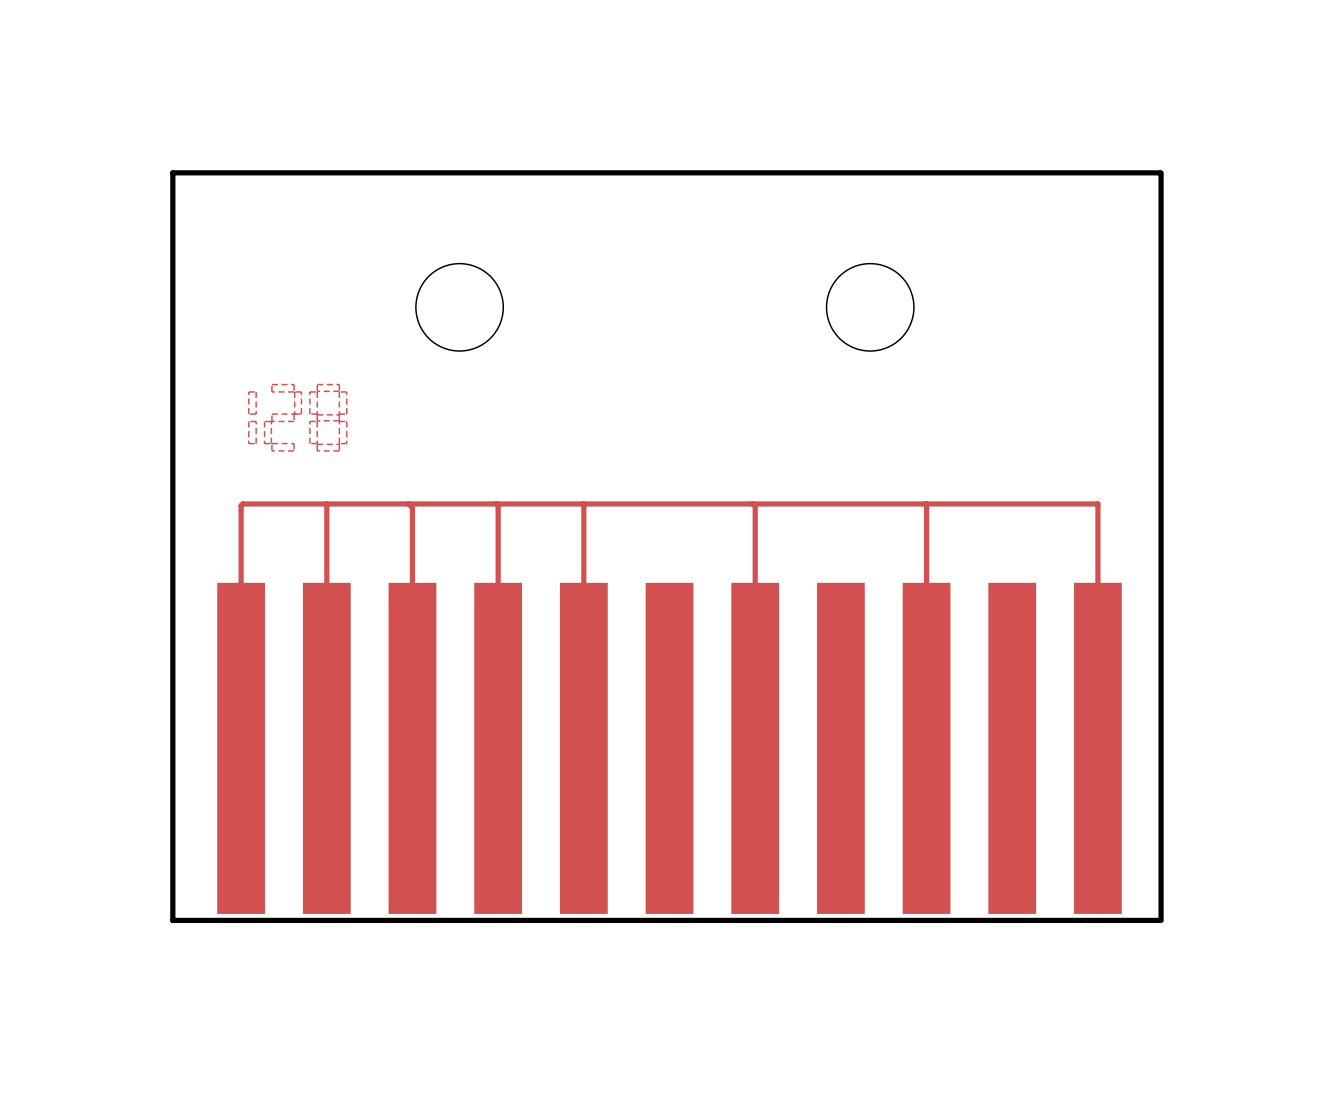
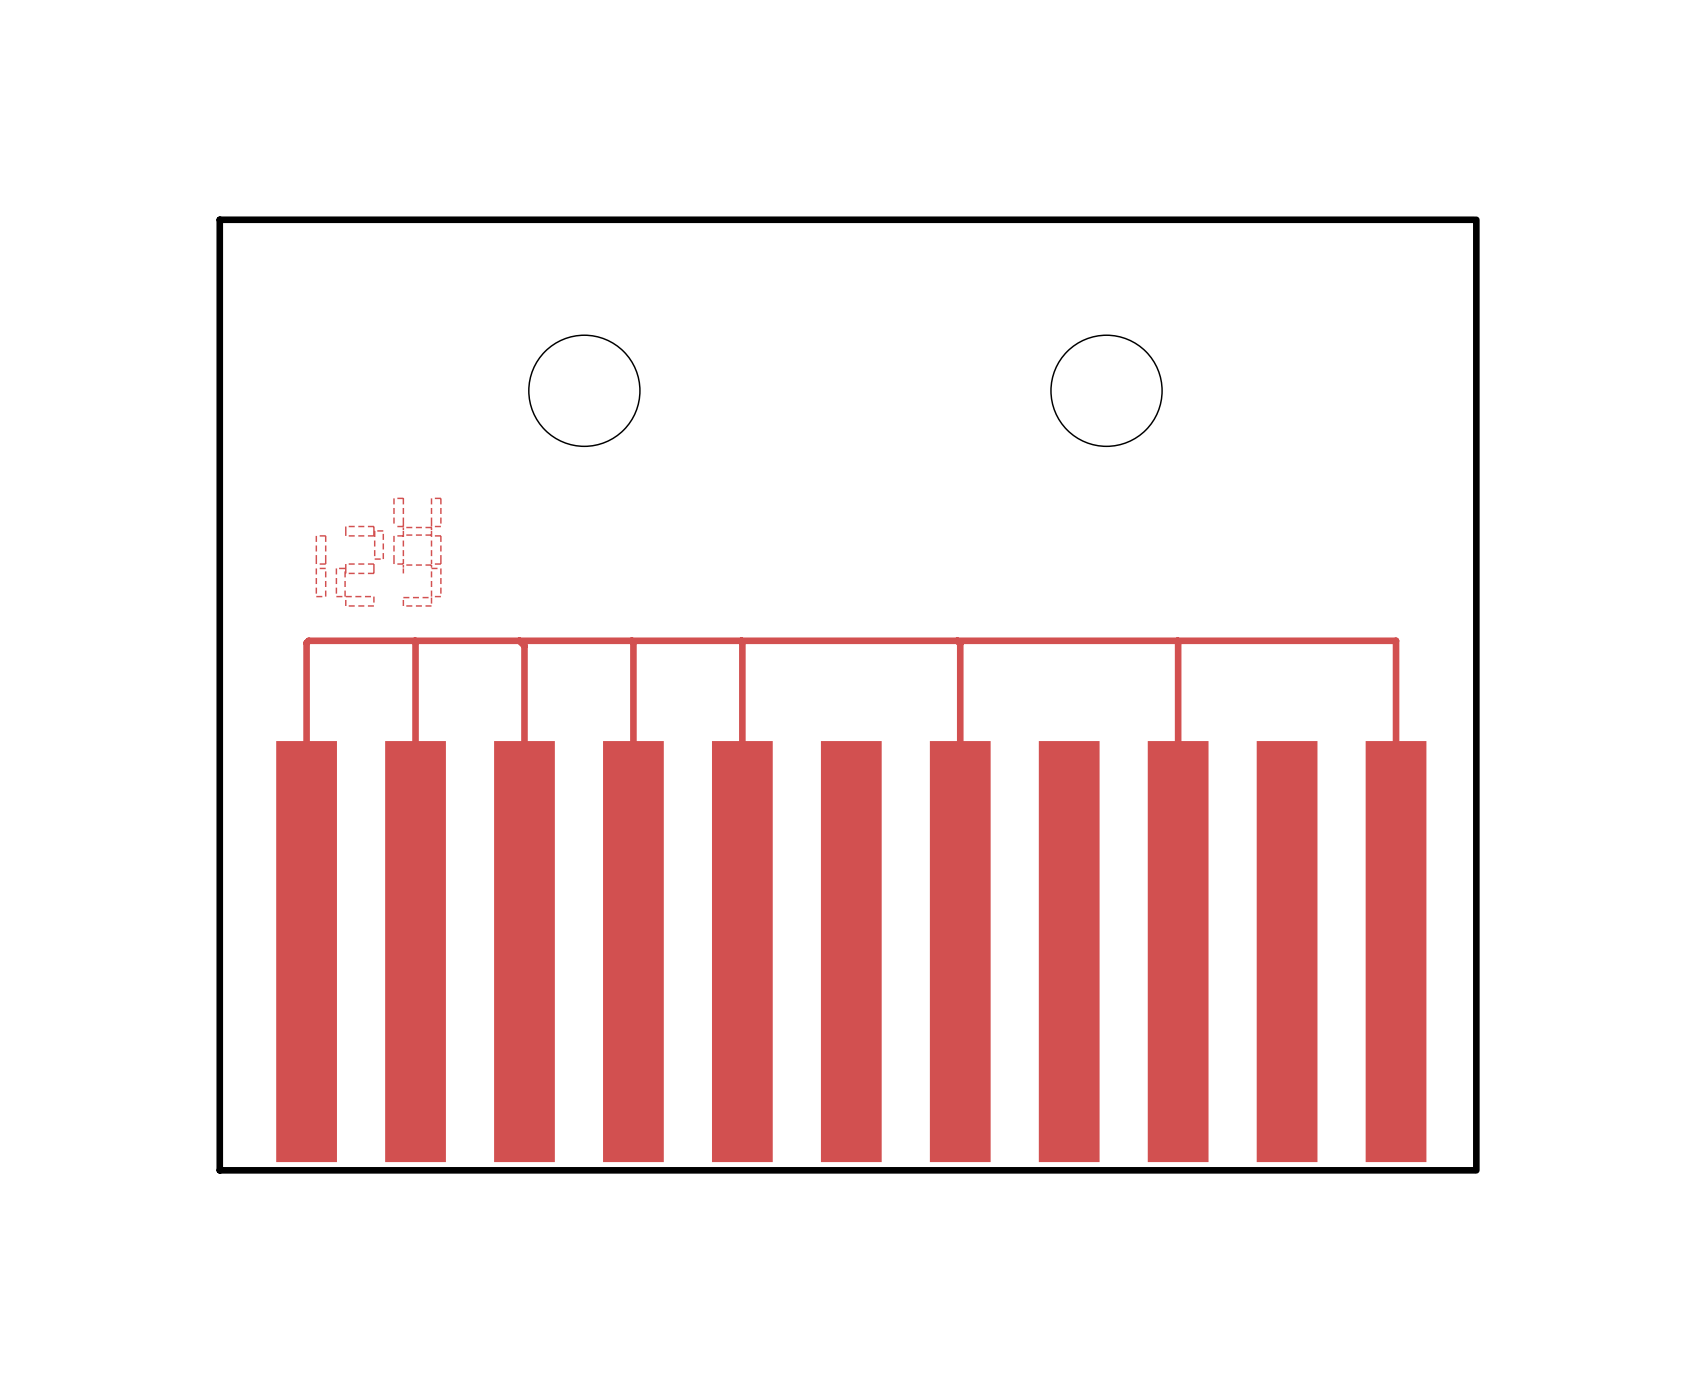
top zone outline: (294, 384) (271, 384) (271, 391) (294, 391) (294, 384) -> (373, 596) (345, 596) (345, 605) (373, 605) (373, 596)
top zone outline: (339, 384) (339, 391) (317, 391) (317, 384) (339, 384) -> (431, 597) (431, 605) (403, 605) (403, 597) (431, 597)
top zone outline: (256, 391) (248, 391) (248, 414) (256, 414) (256, 391) -> (325, 568) (316, 568) (316, 596) (325, 596) (325, 568)
top zone outline: (301, 391) (294, 391) (294, 414) (301, 414) (301, 391) -> (383, 530) (374, 530) (374, 559) (383, 559) (383, 530)
top zone outline: (271, 421) (264, 421) (264, 443) (271, 443) (271, 421) -> (345, 568) (336, 568) (336, 596) (345, 596) (345, 568)
top zone outline: (339, 450) (317, 450) -> (431, 573) (431, 596) (440, 596) (440, 568) (431, 568)

